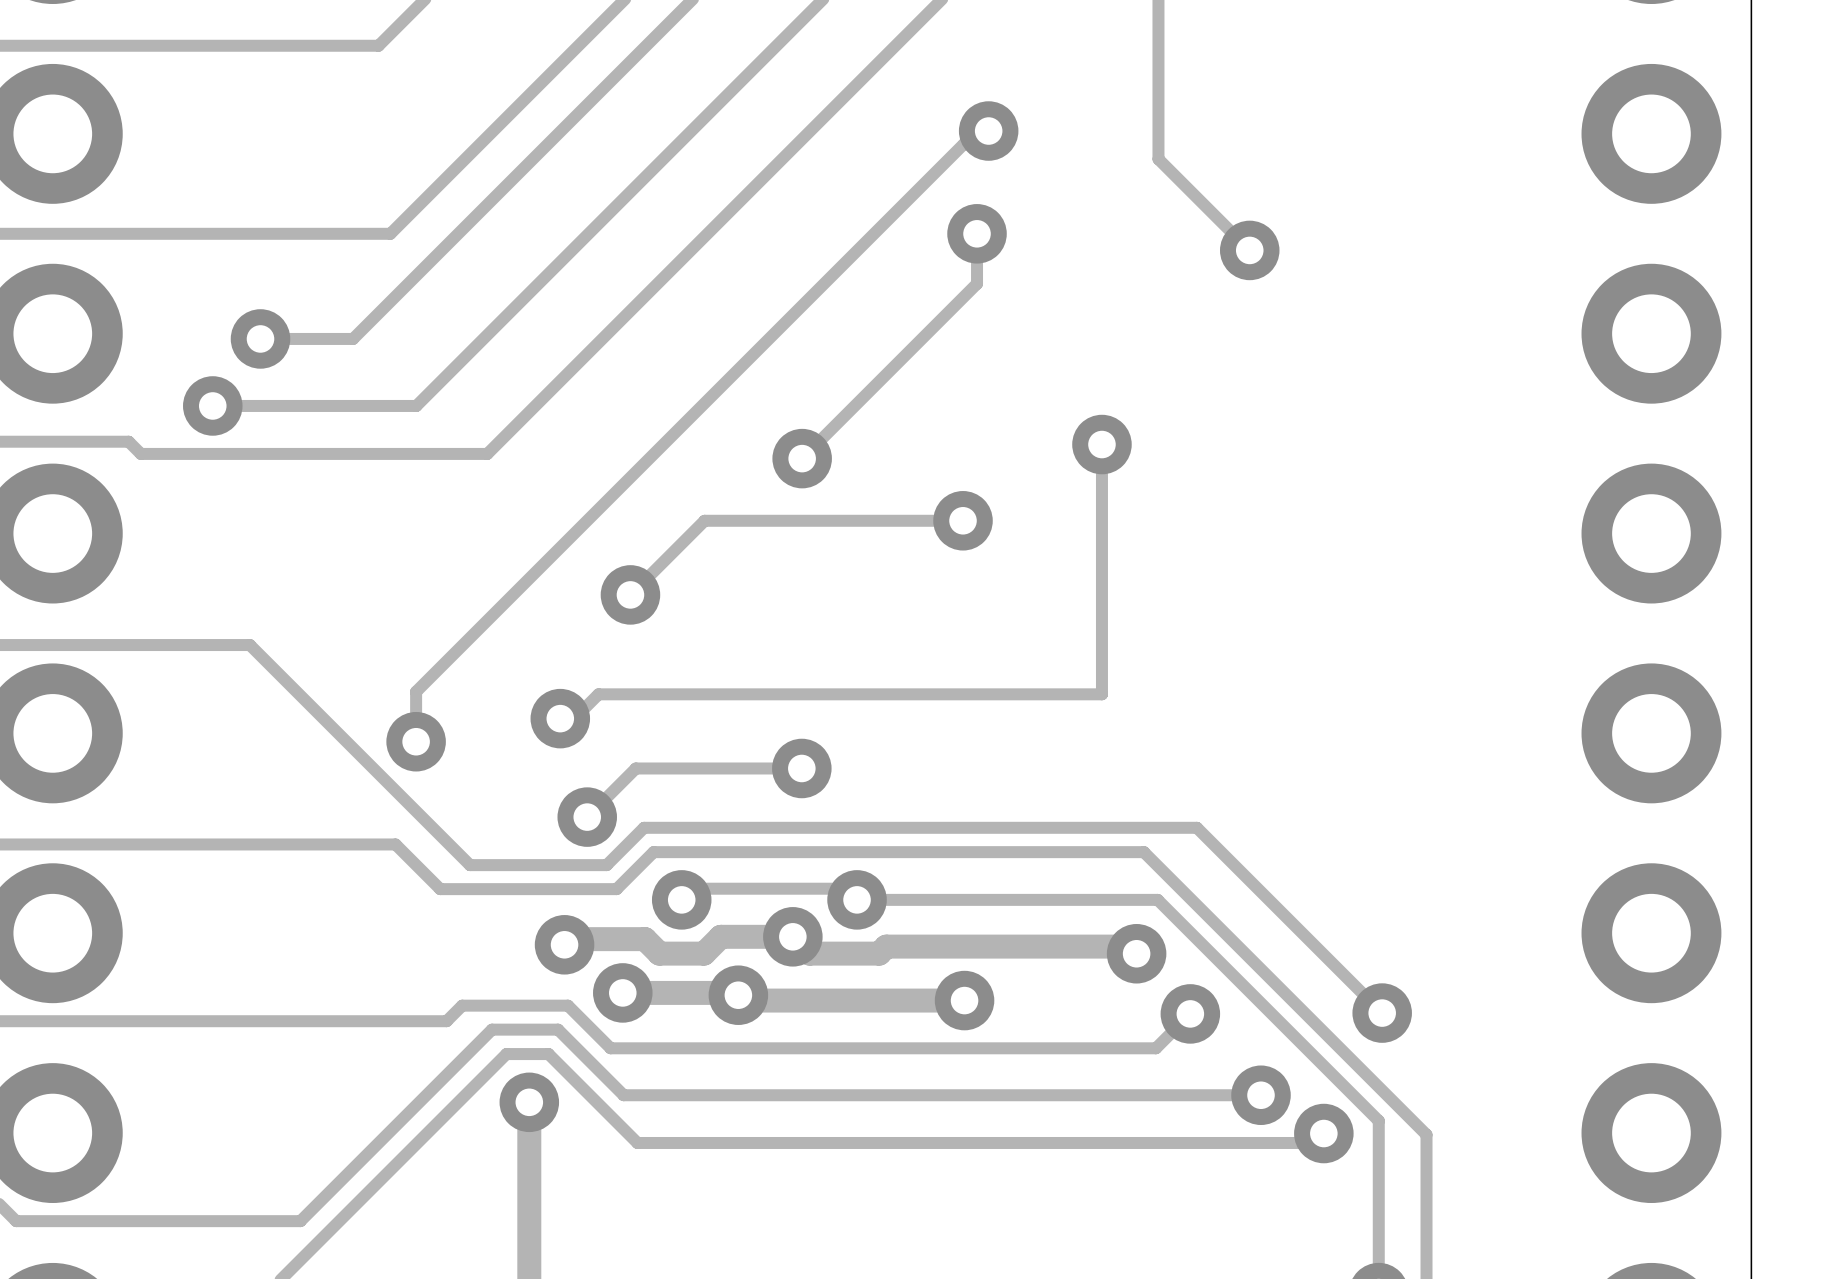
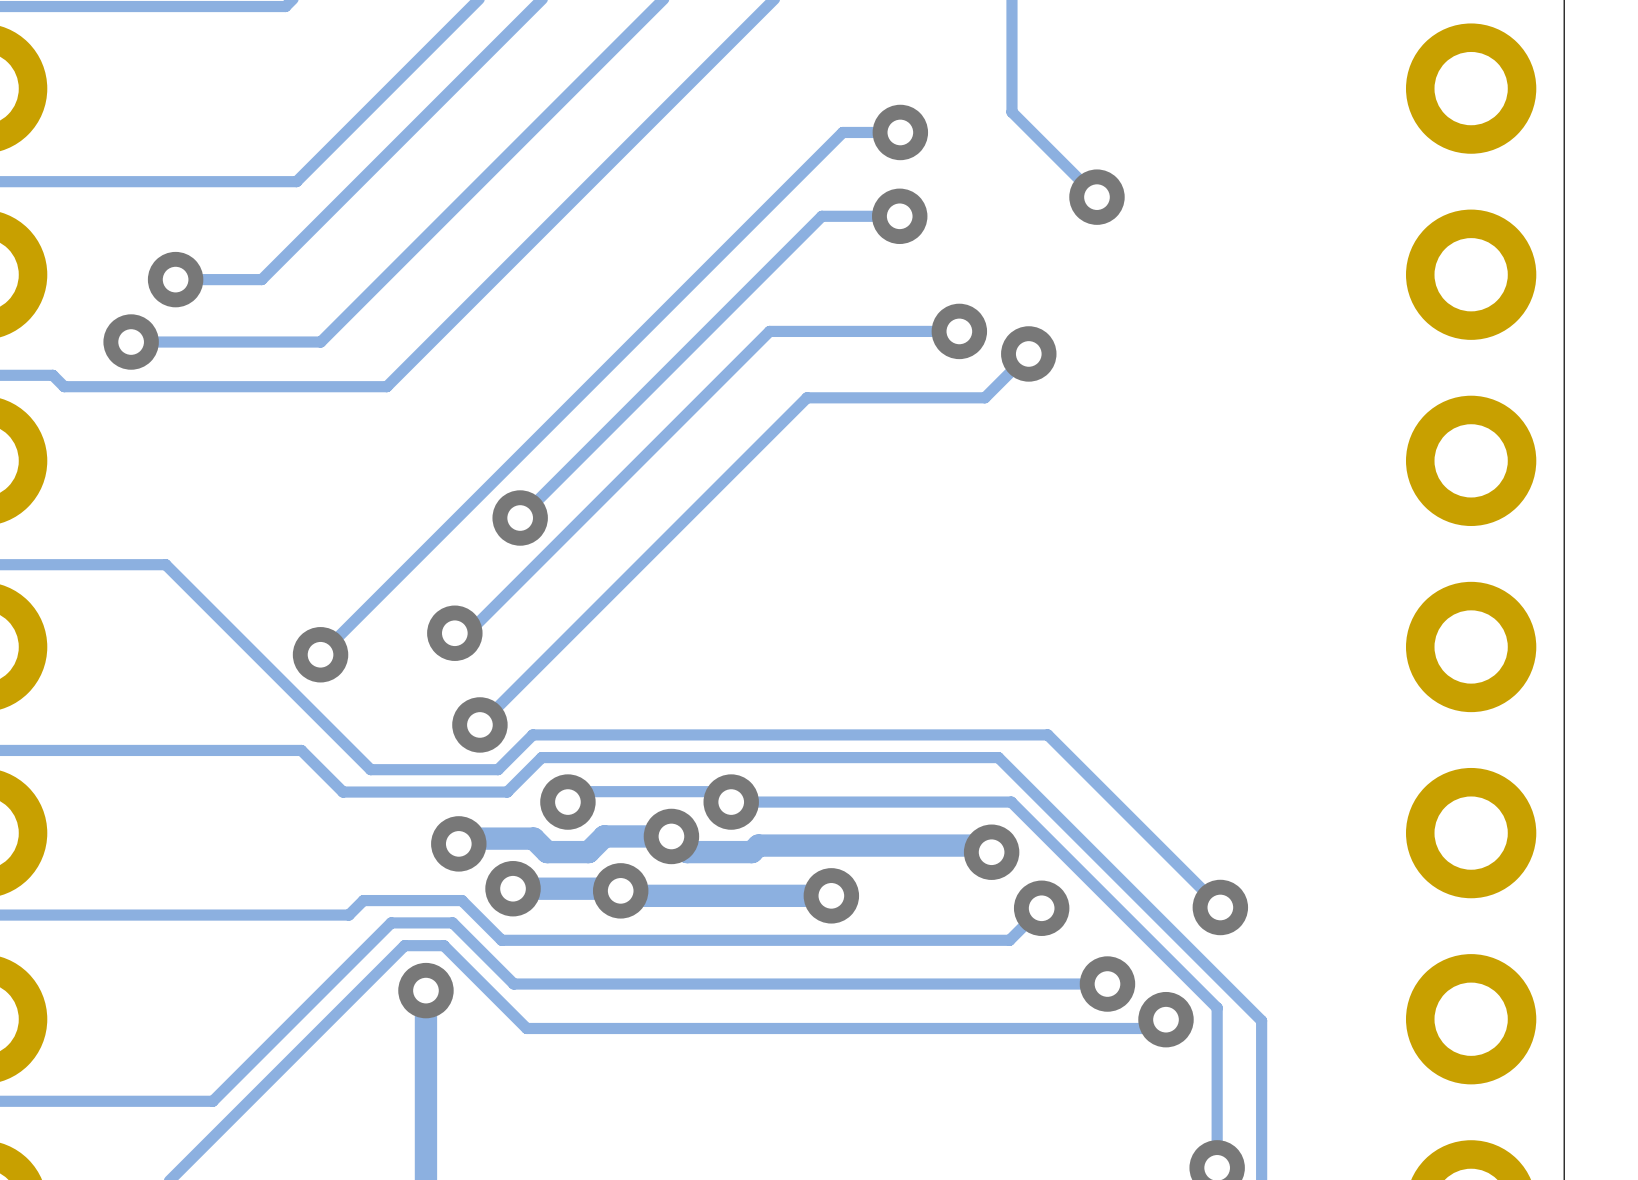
track: (988, 131) (975, 144) (963, 144) (416, 691) (416, 741) -> (900, 132) (842, 132) (320, 654)
via position: (988, 131) -> (900, 132)
track: (977, 233) (977, 283) (802, 458) -> none
via: (977, 233) -> none
via: none -> (899, 216)
via: none -> (1028, 353)
track: (1101, 444) (1101, 694) (598, 694) -> (959, 331) (769, 331) (490, 610)
via position: (1101, 444) -> (959, 331)
via: (802, 458) -> none
track: (963, 520) (704, 520) -> (899, 216) (821, 216) (589, 448)
via: (963, 520) -> none
track: (801, 768) (635, 768) -> (1028, 353) (984, 397) (807, 397) (525, 679)
via: (801, 768) -> none

